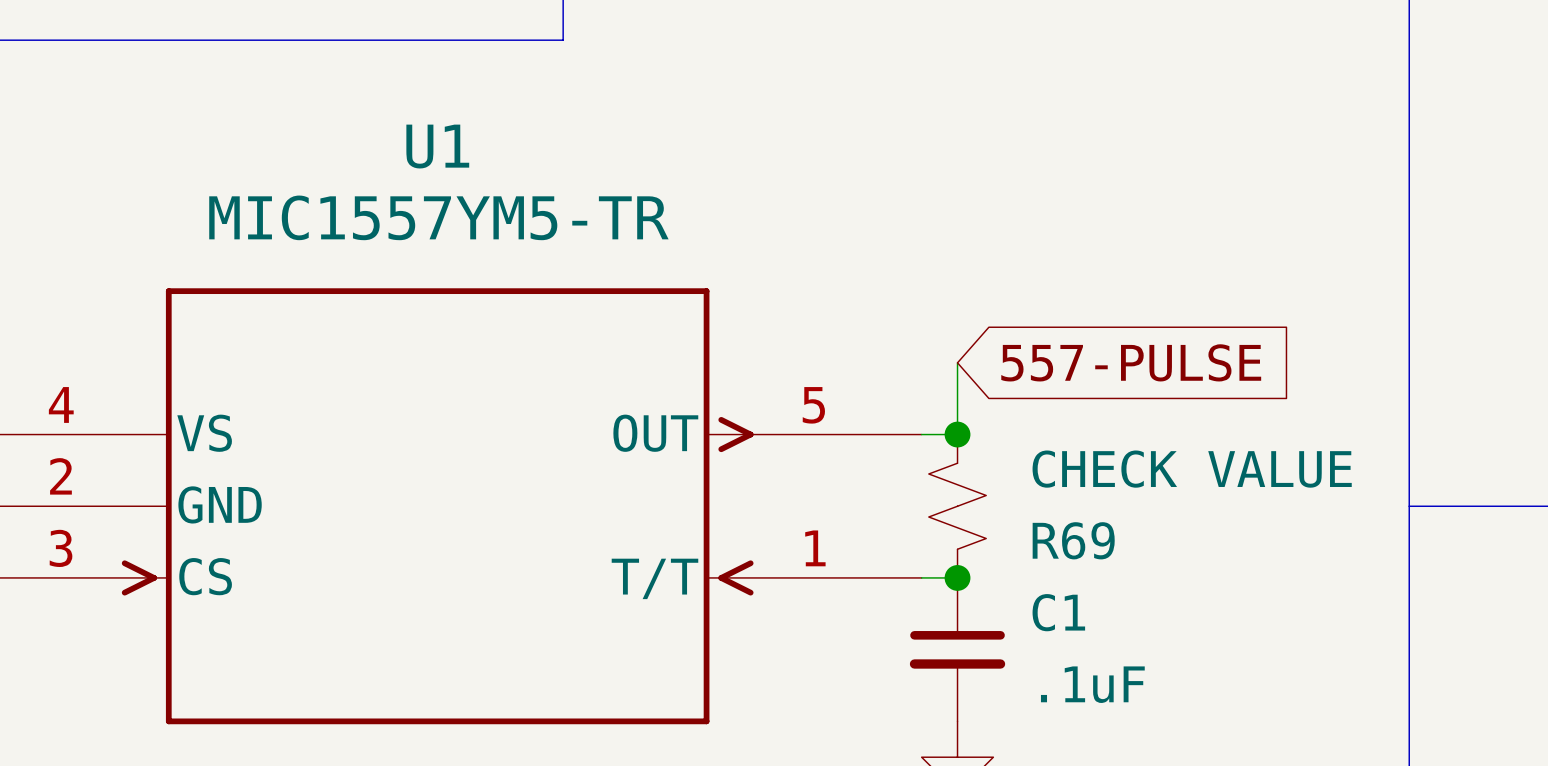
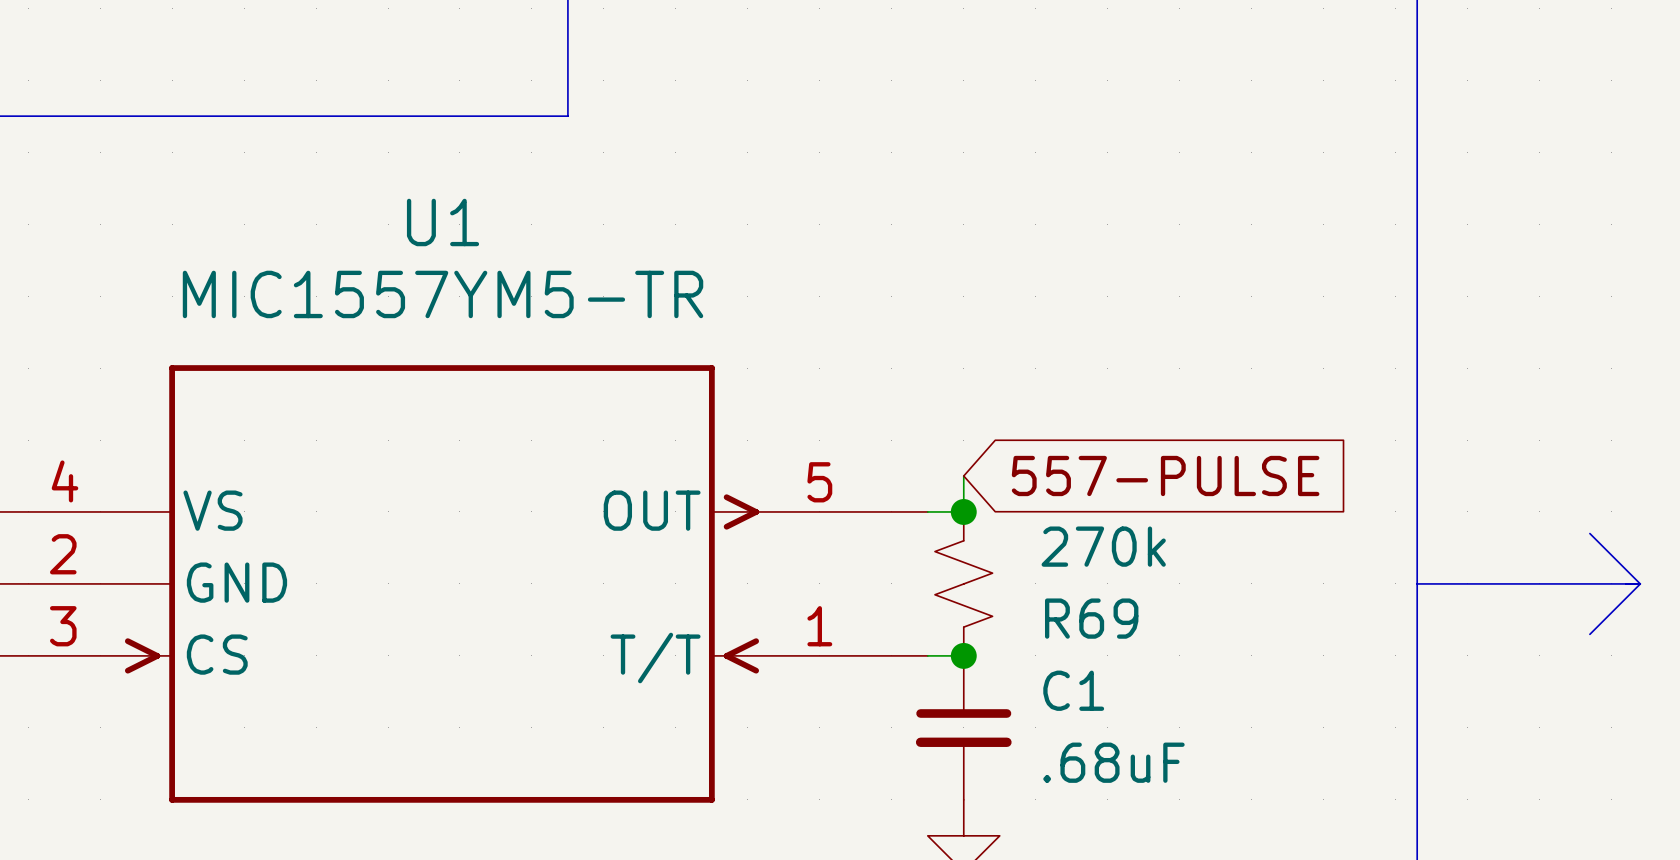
wire: (957, 362) (957, 398) -> none
global label position: 557-PULSE (1131, 362) -> 557-PULSE (1165, 475)
R69 value: CHECK VALUE (1192, 469) -> 270k (1103, 546)
C1 value: .1uF (1092, 684) -> .68uF (1113, 762)

